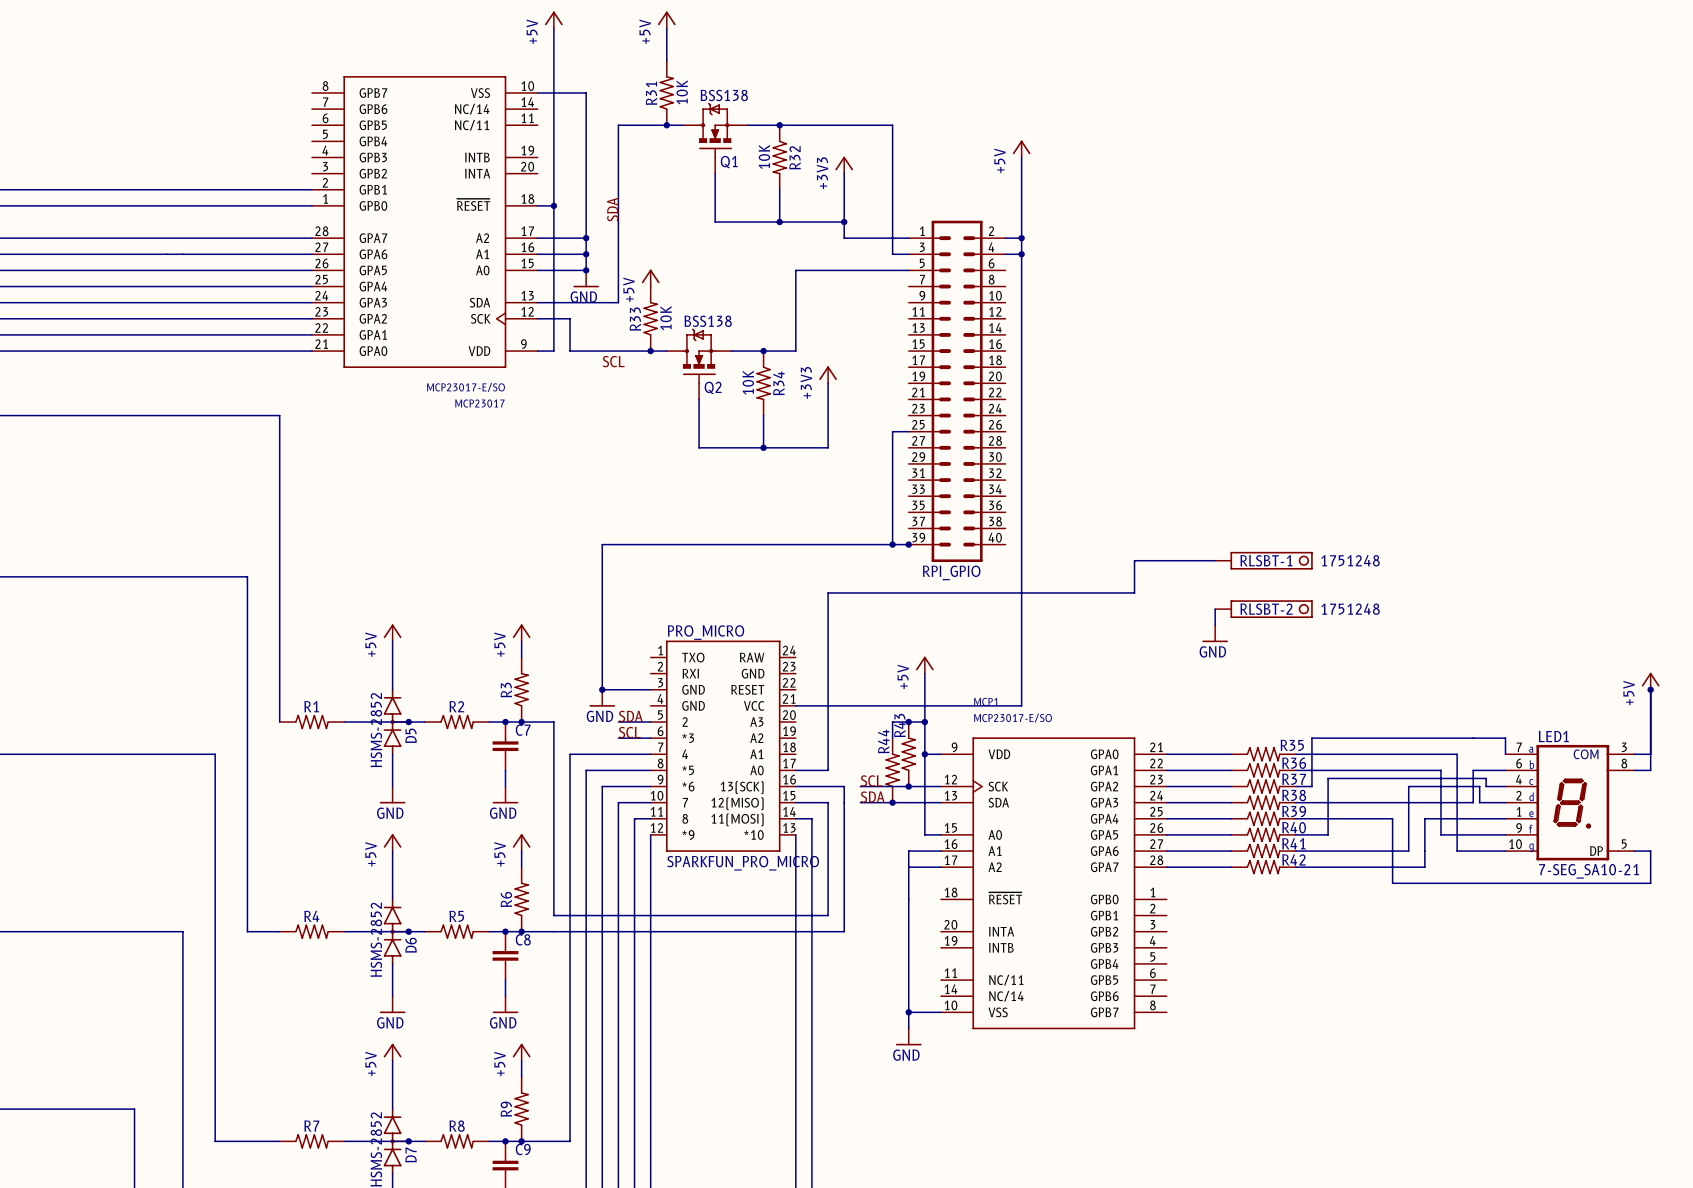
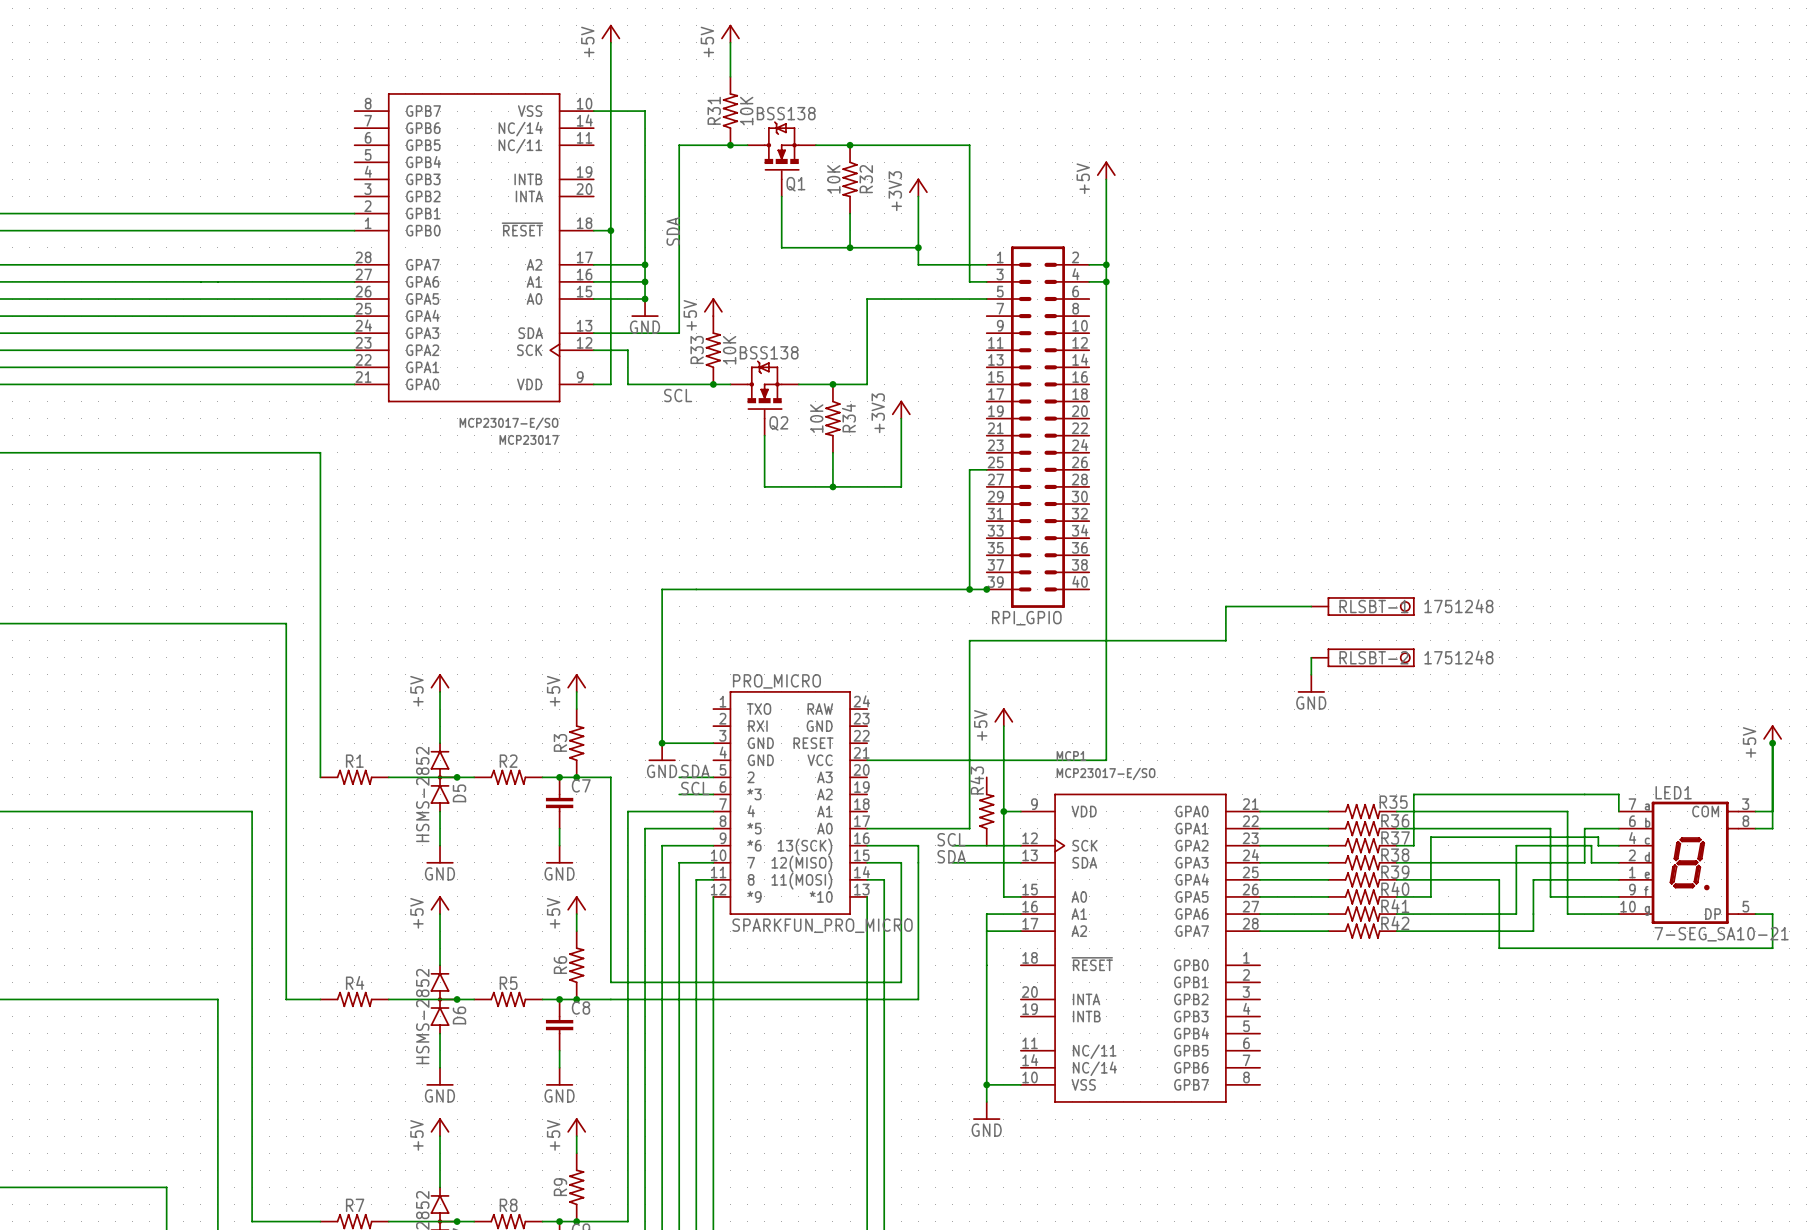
wire: (892, 592) (828, 592) (828, 770) -> (969, 640) (969, 777)
wire: (892, 722) (924, 722) -> none
junction: (908, 722) -> none
junction: (924, 722) -> none
wire: none -> (969, 794) (969, 828) (901, 828)
R44: (892, 770) -> none
wire: (860, 786) (876, 786) -> none
junction: (908, 786) -> none
wire: (860, 802) (876, 802) -> none
junction: (892, 802) -> none

